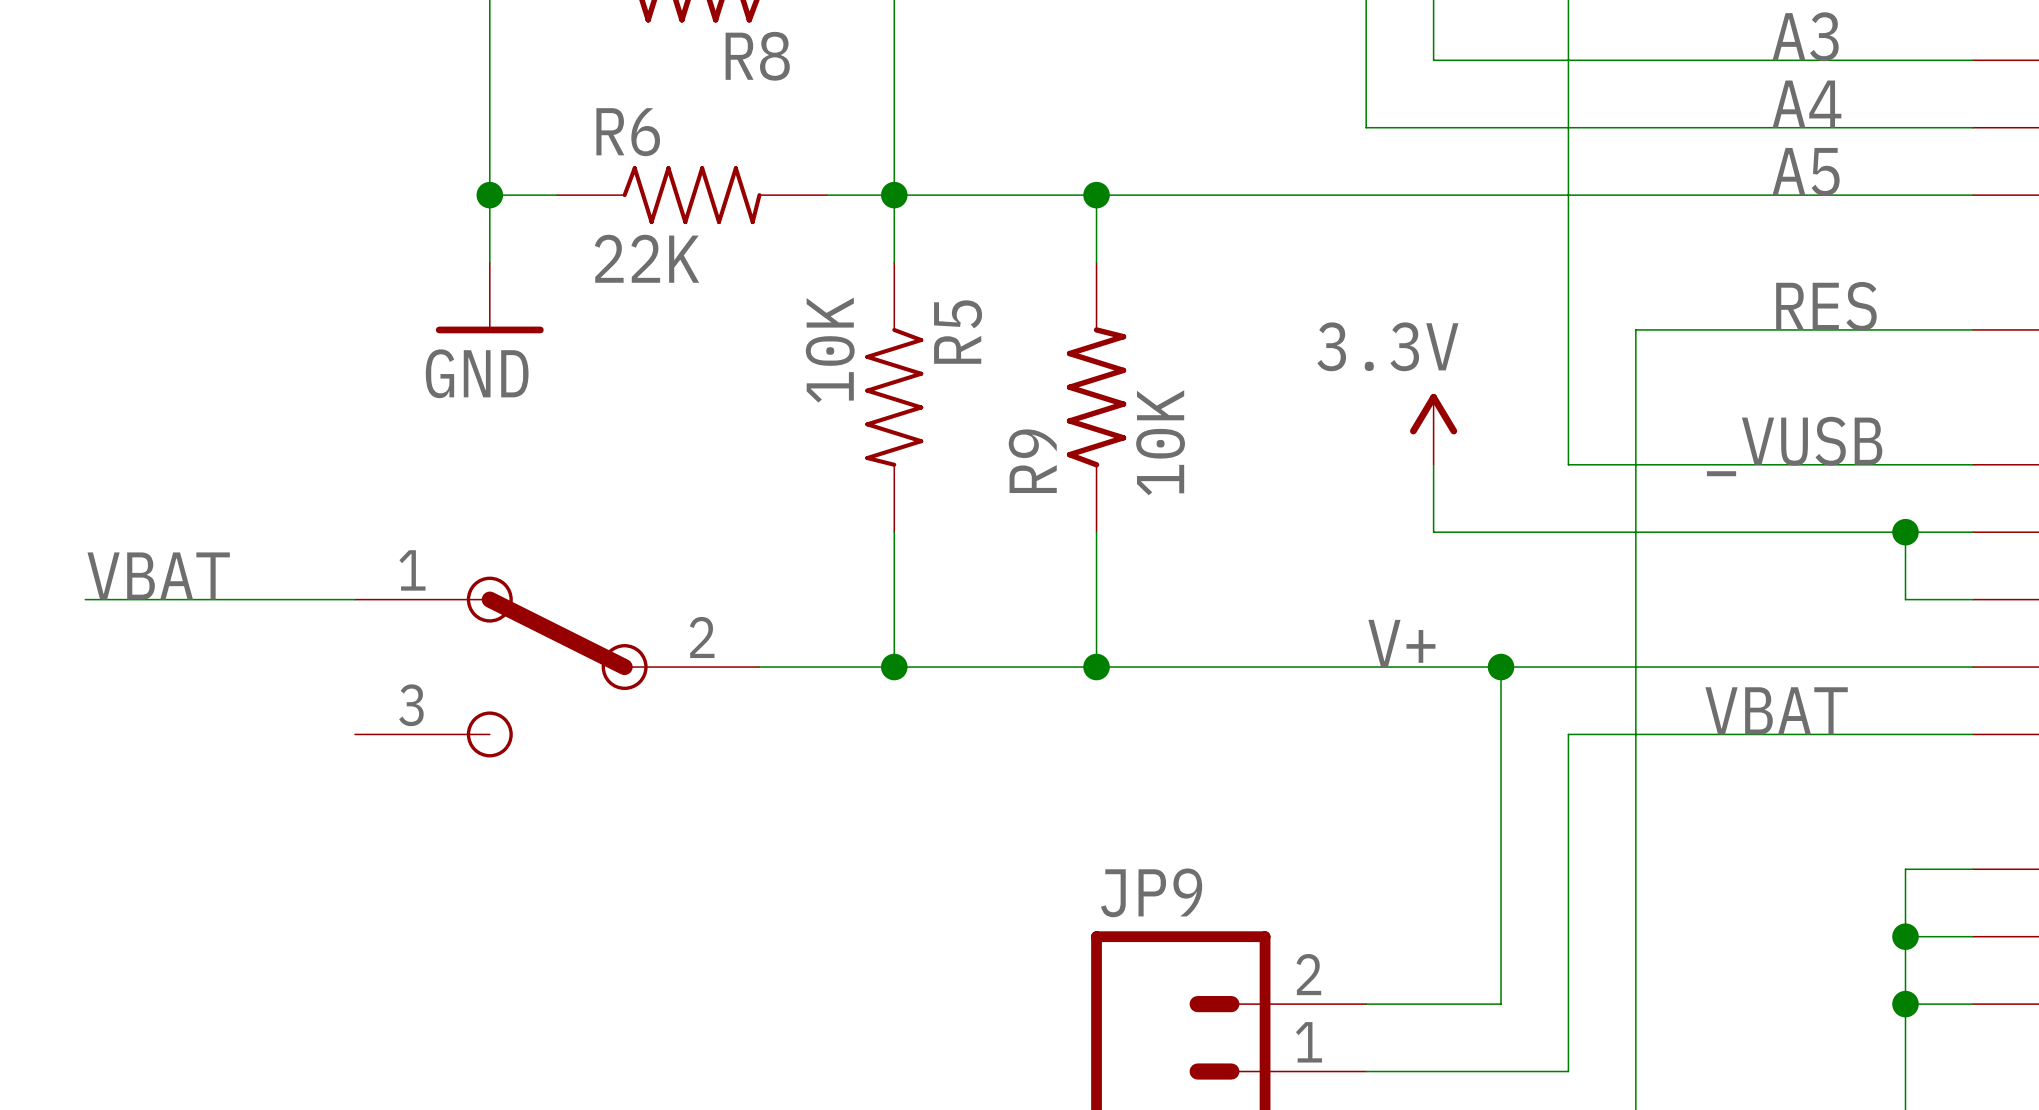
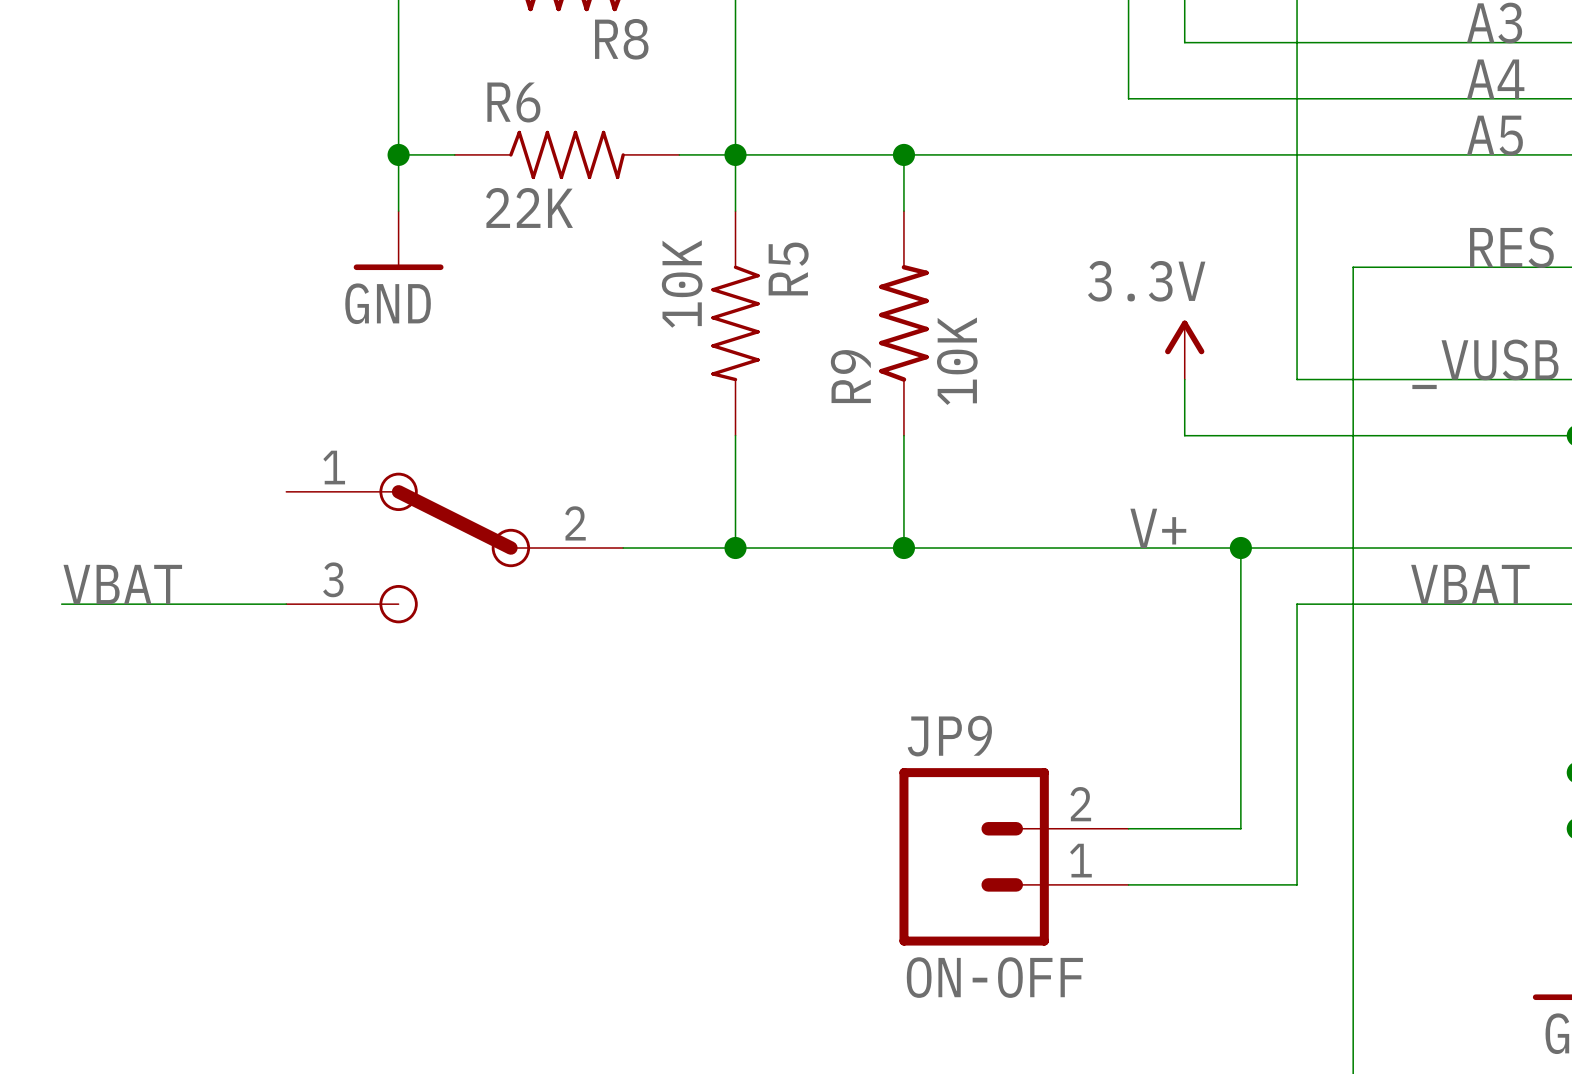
label position: VBAT (158, 576) -> VBAT (122, 584)
wire: (85, 599) (354, 599) -> (61, 604) (286, 604)

